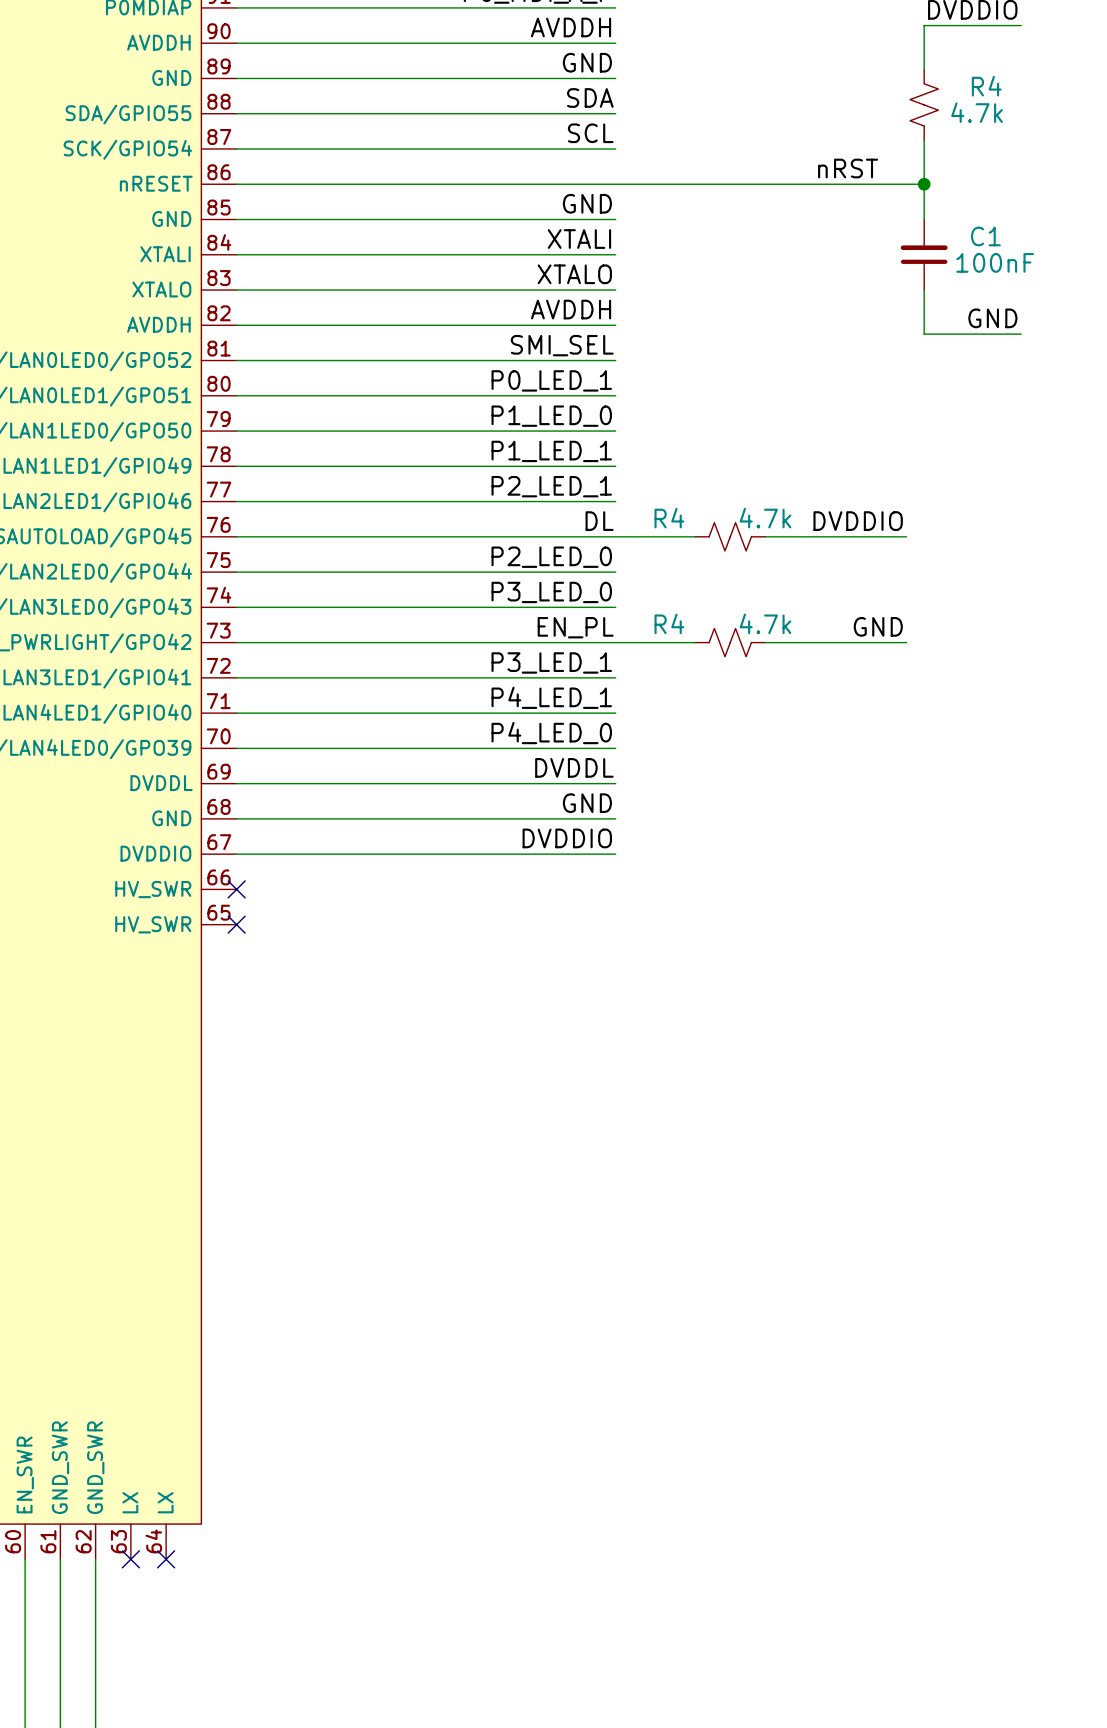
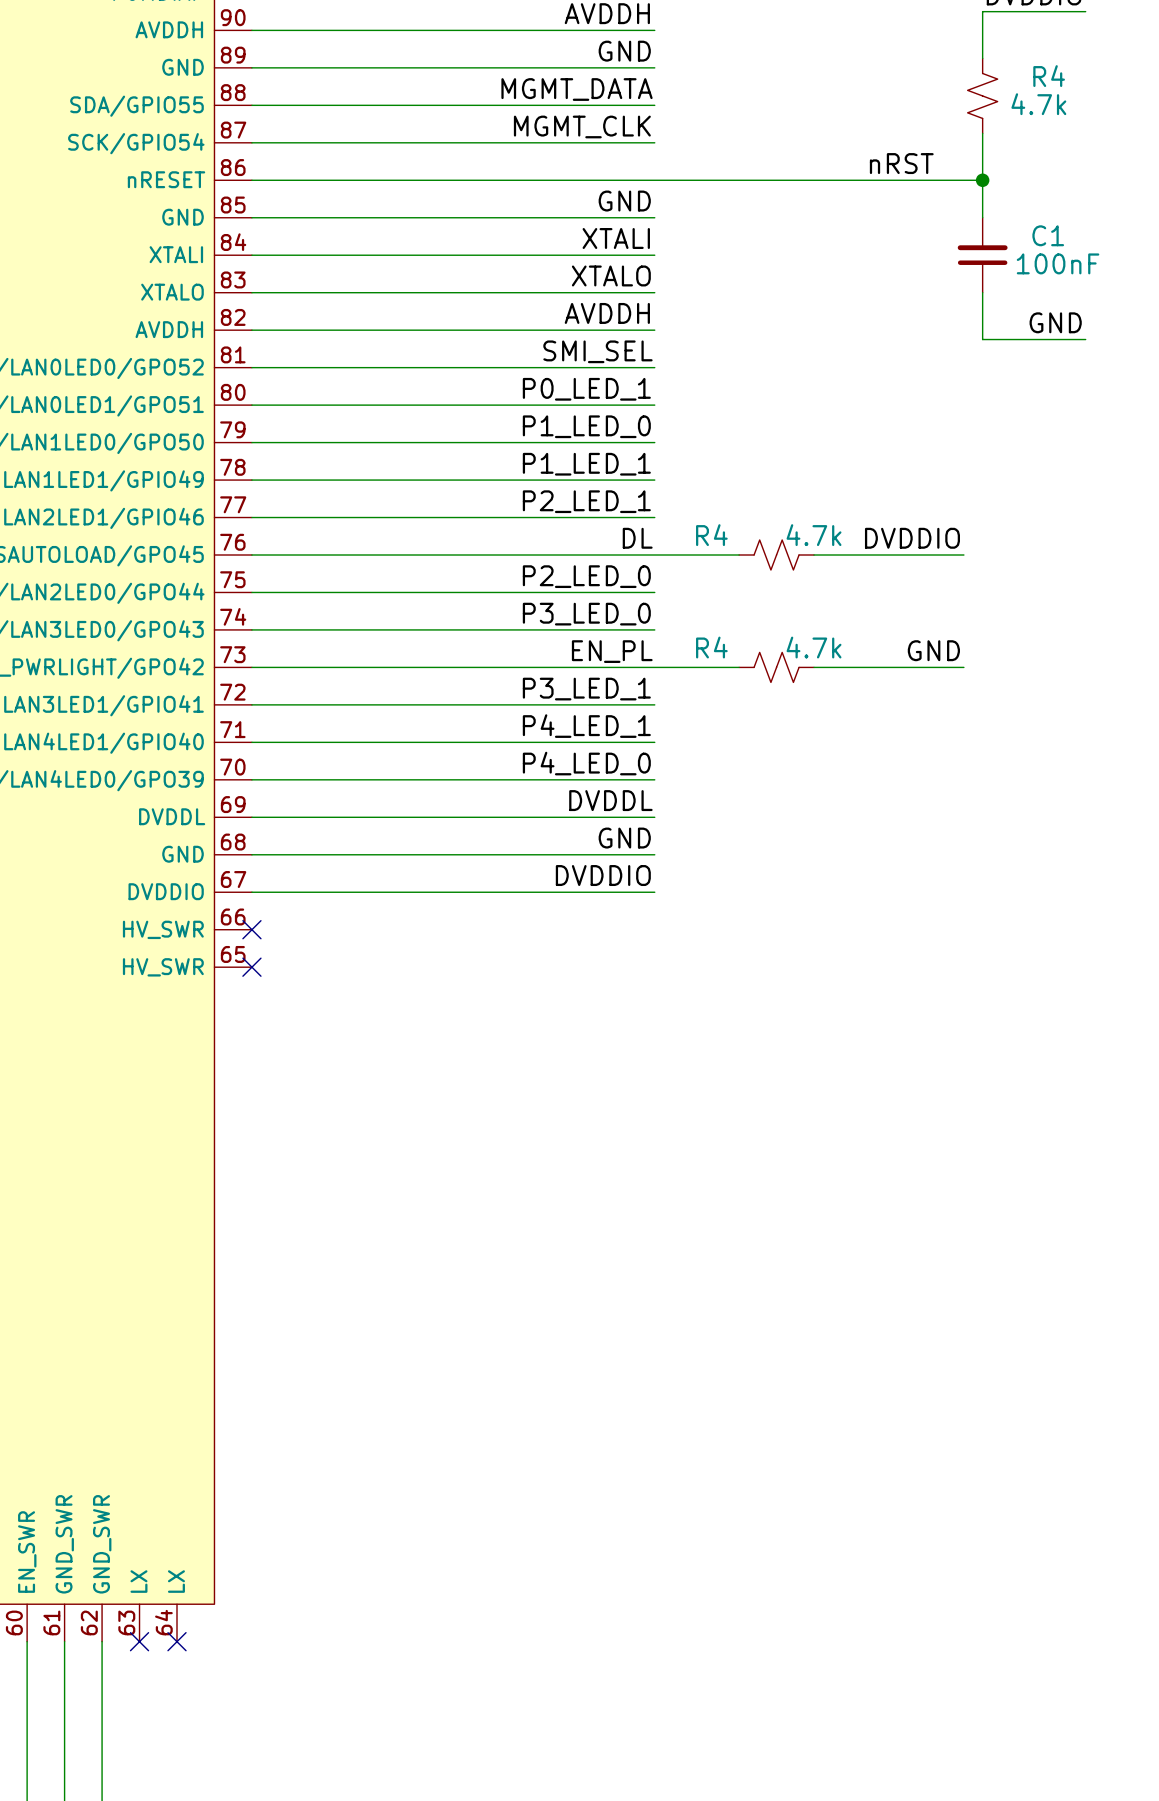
label: SDA (590, 97) -> MGMT_DATA (577, 89)
label: SCL (590, 133) -> MGMT_CLK (582, 126)

